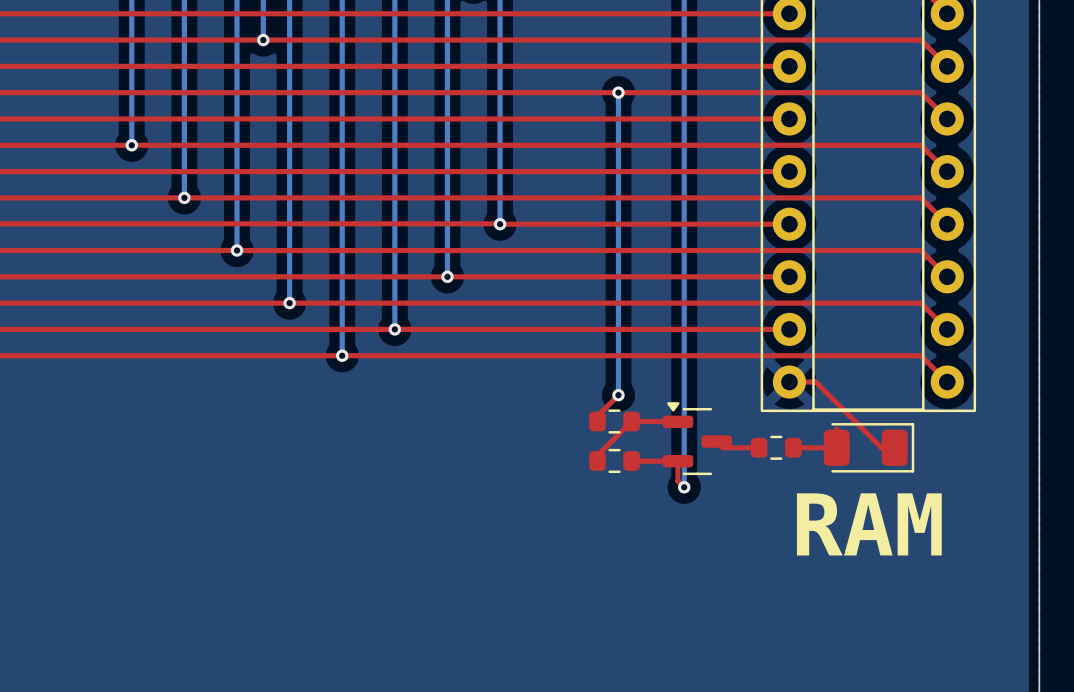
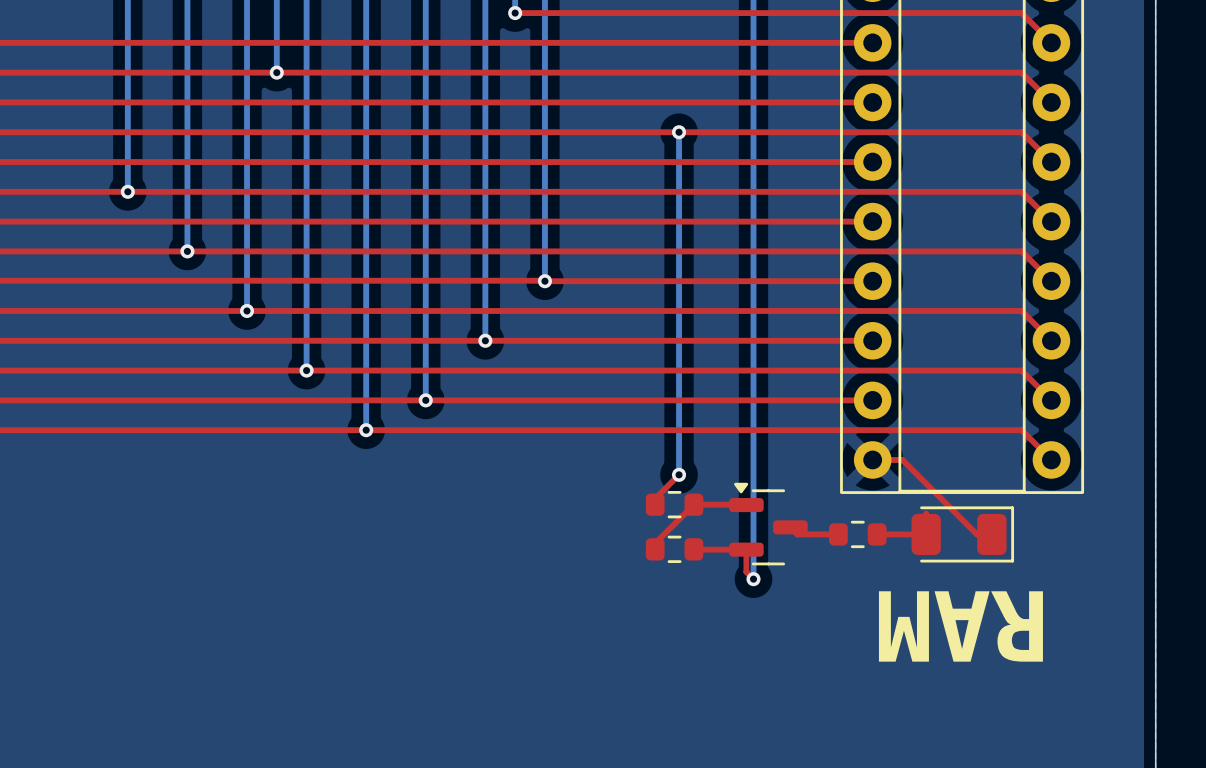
text rotation: 0° (869, 524) -> 180° (960, 626)

